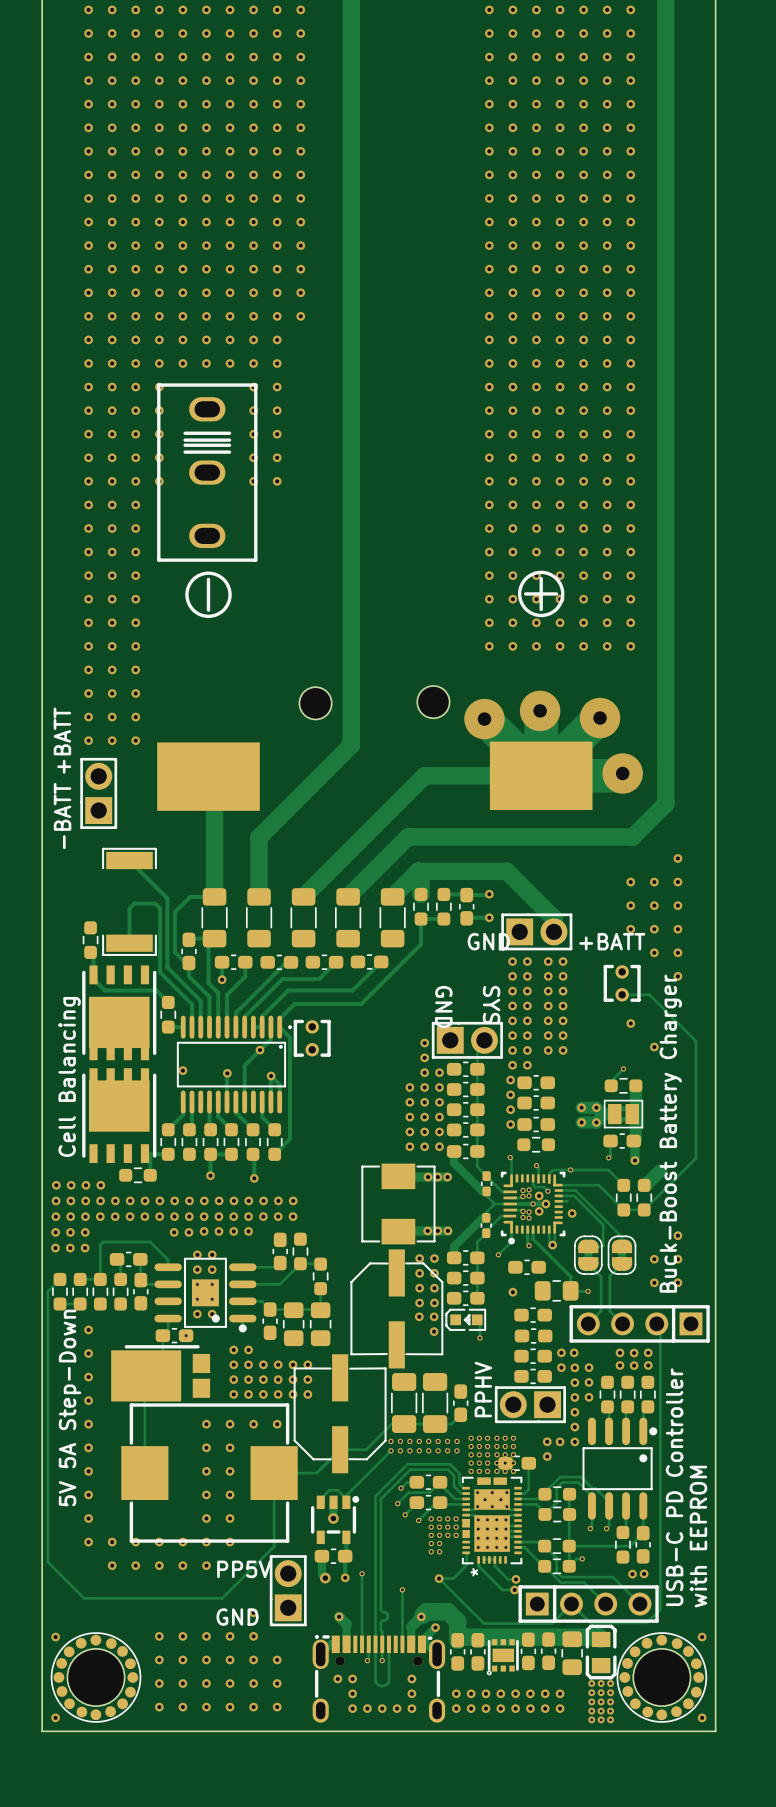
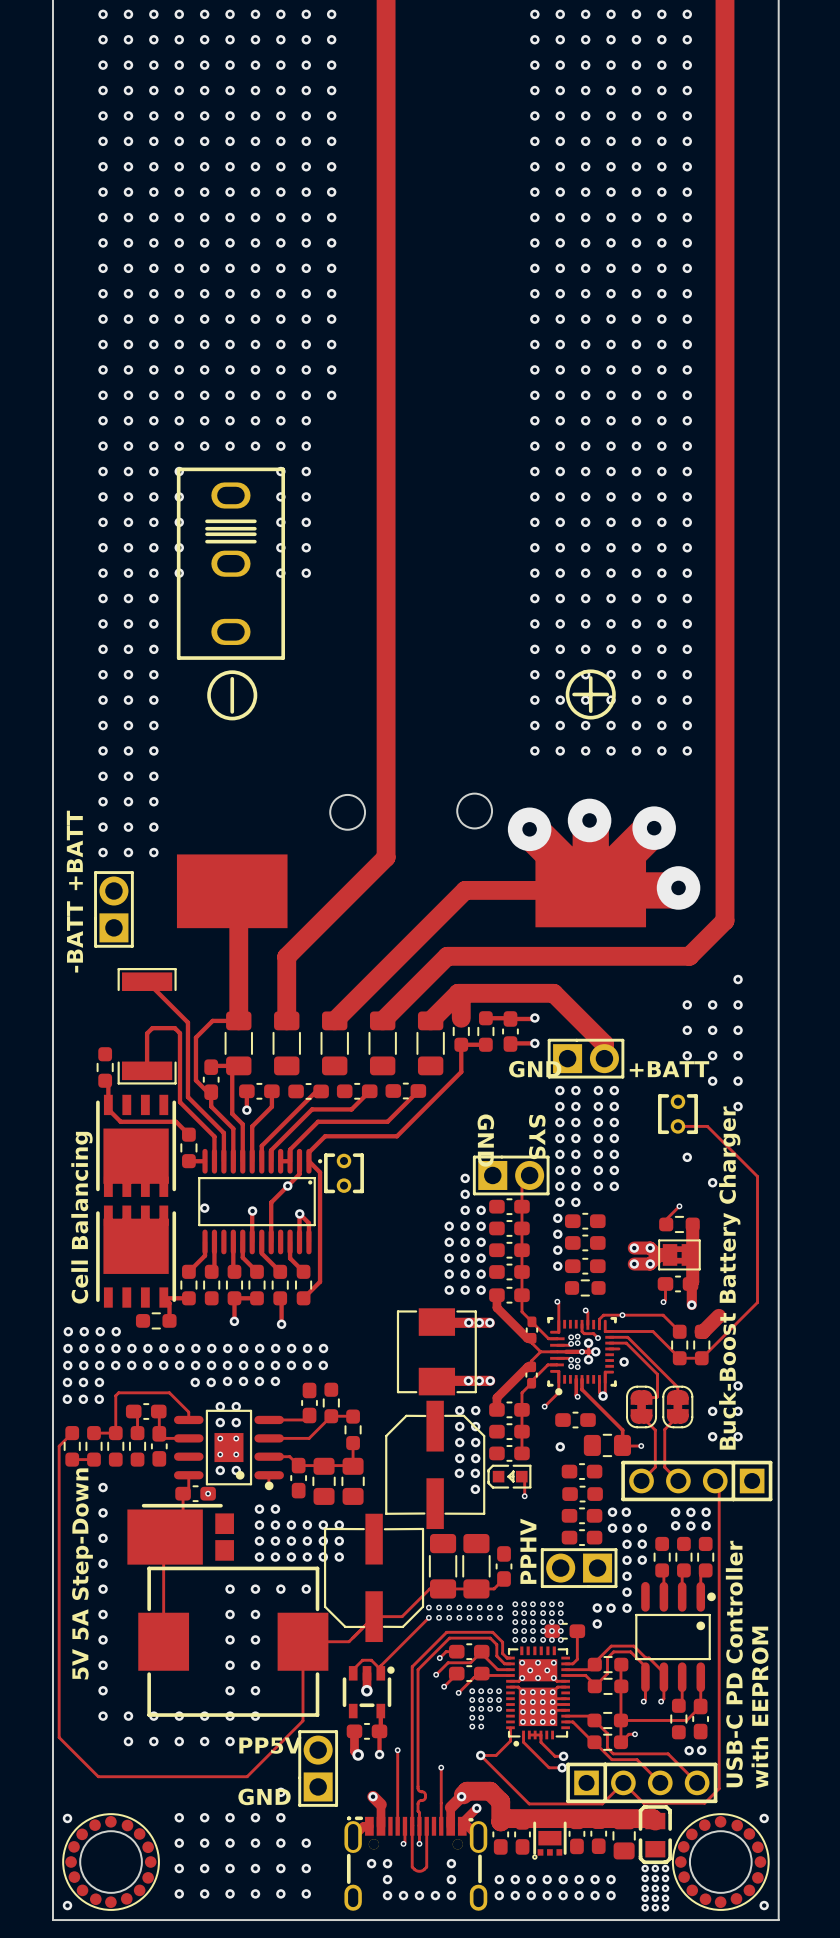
part footprint: [461, 1476, 523, 1565] -> [506, 1646, 570, 1747]

